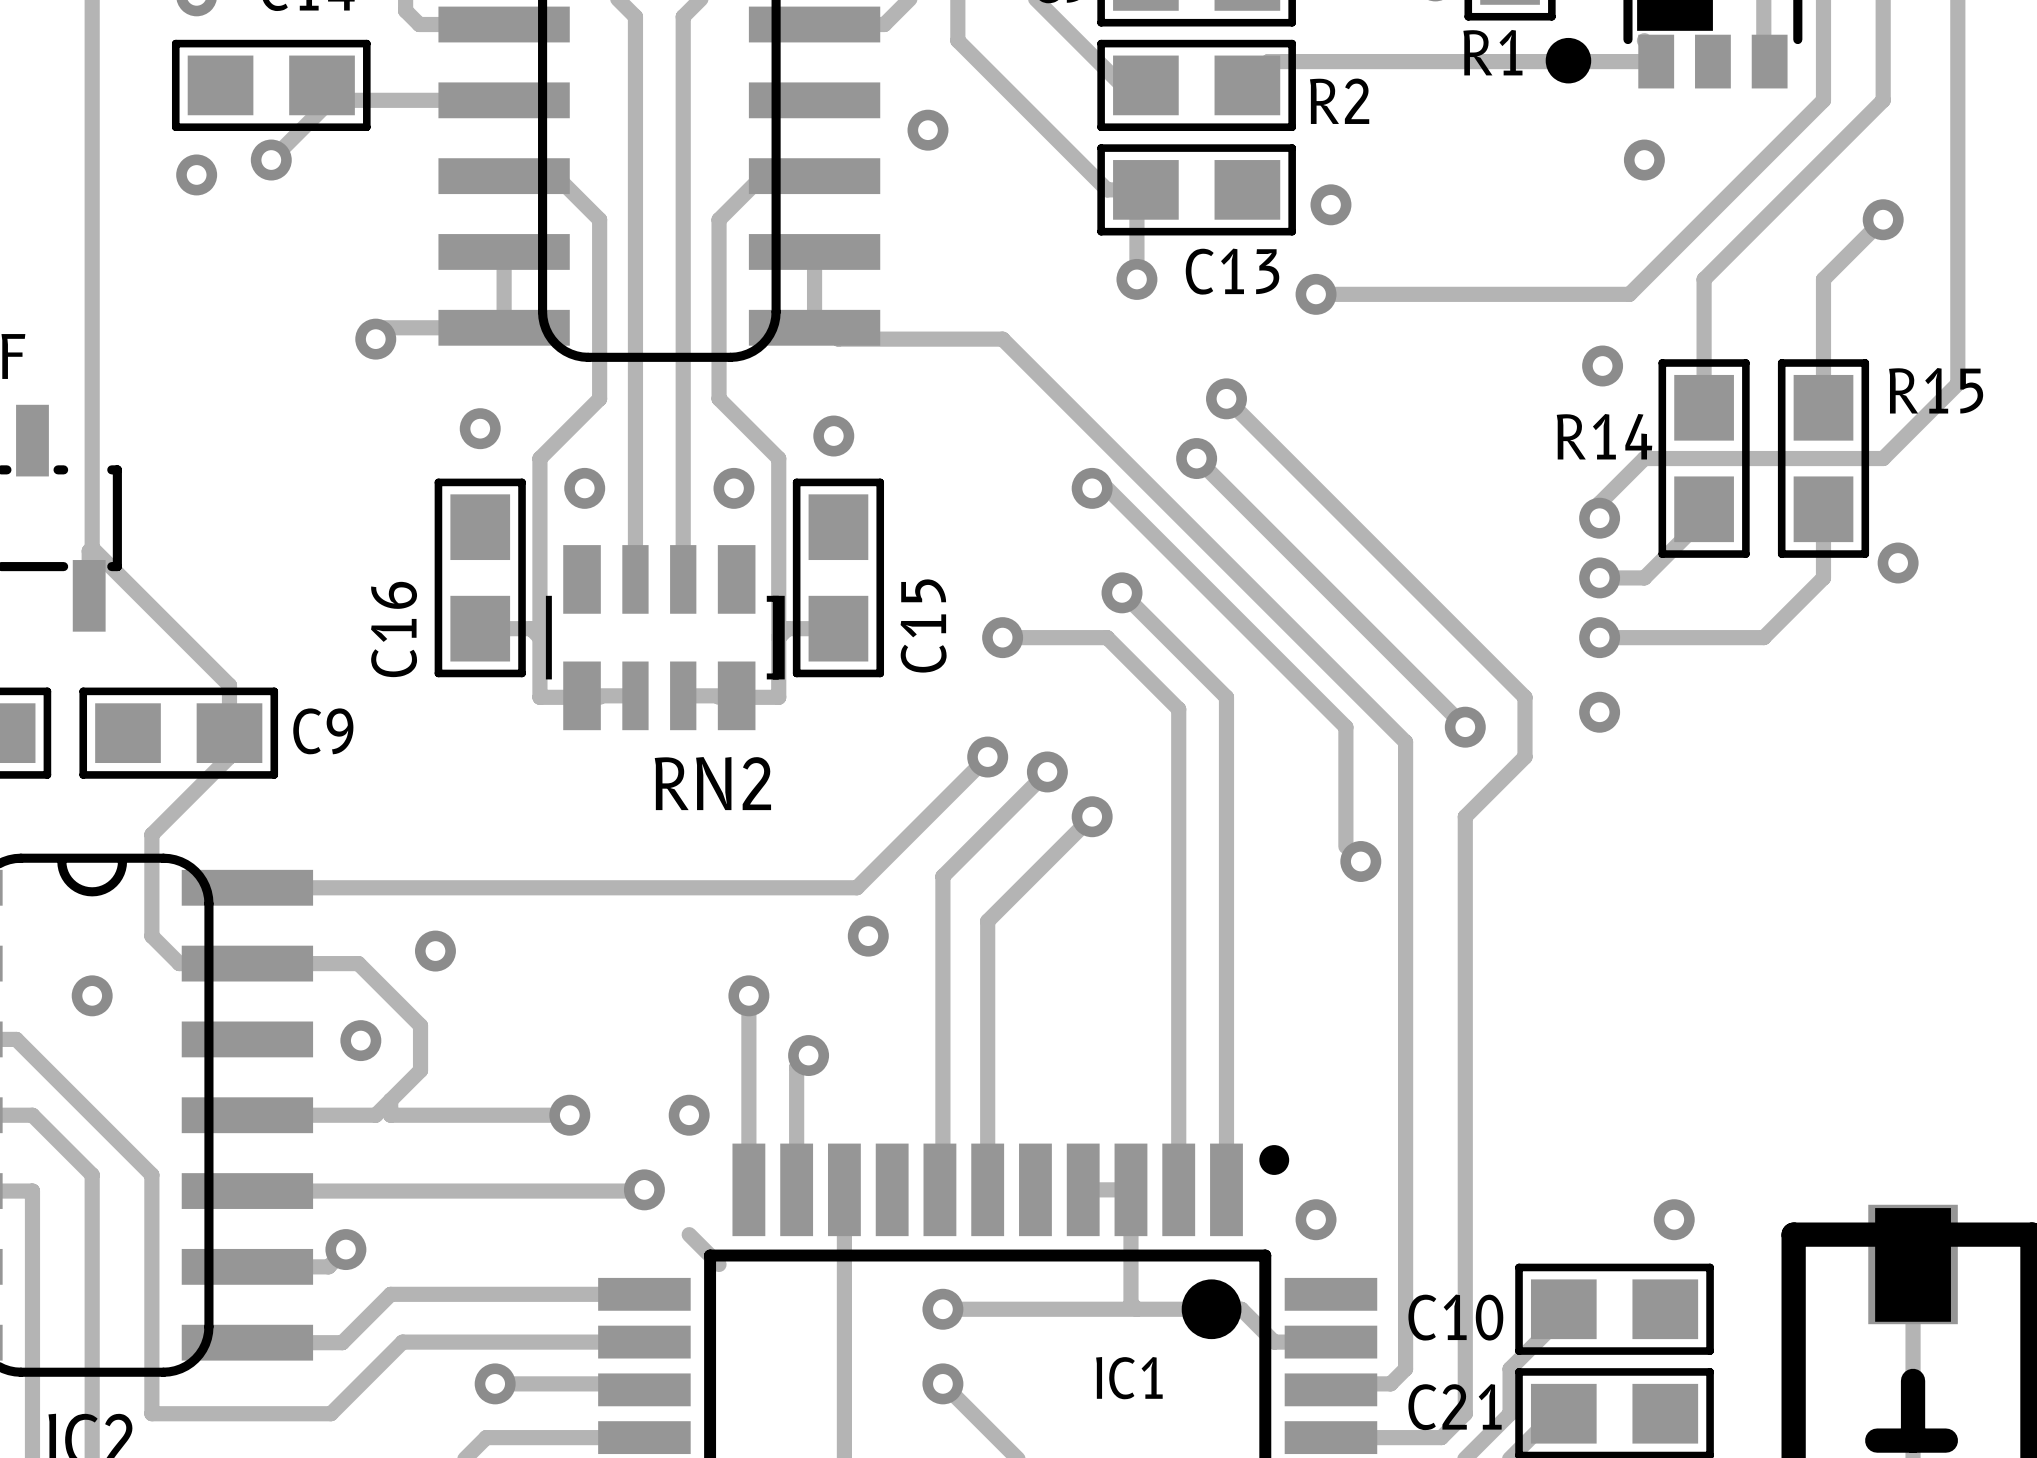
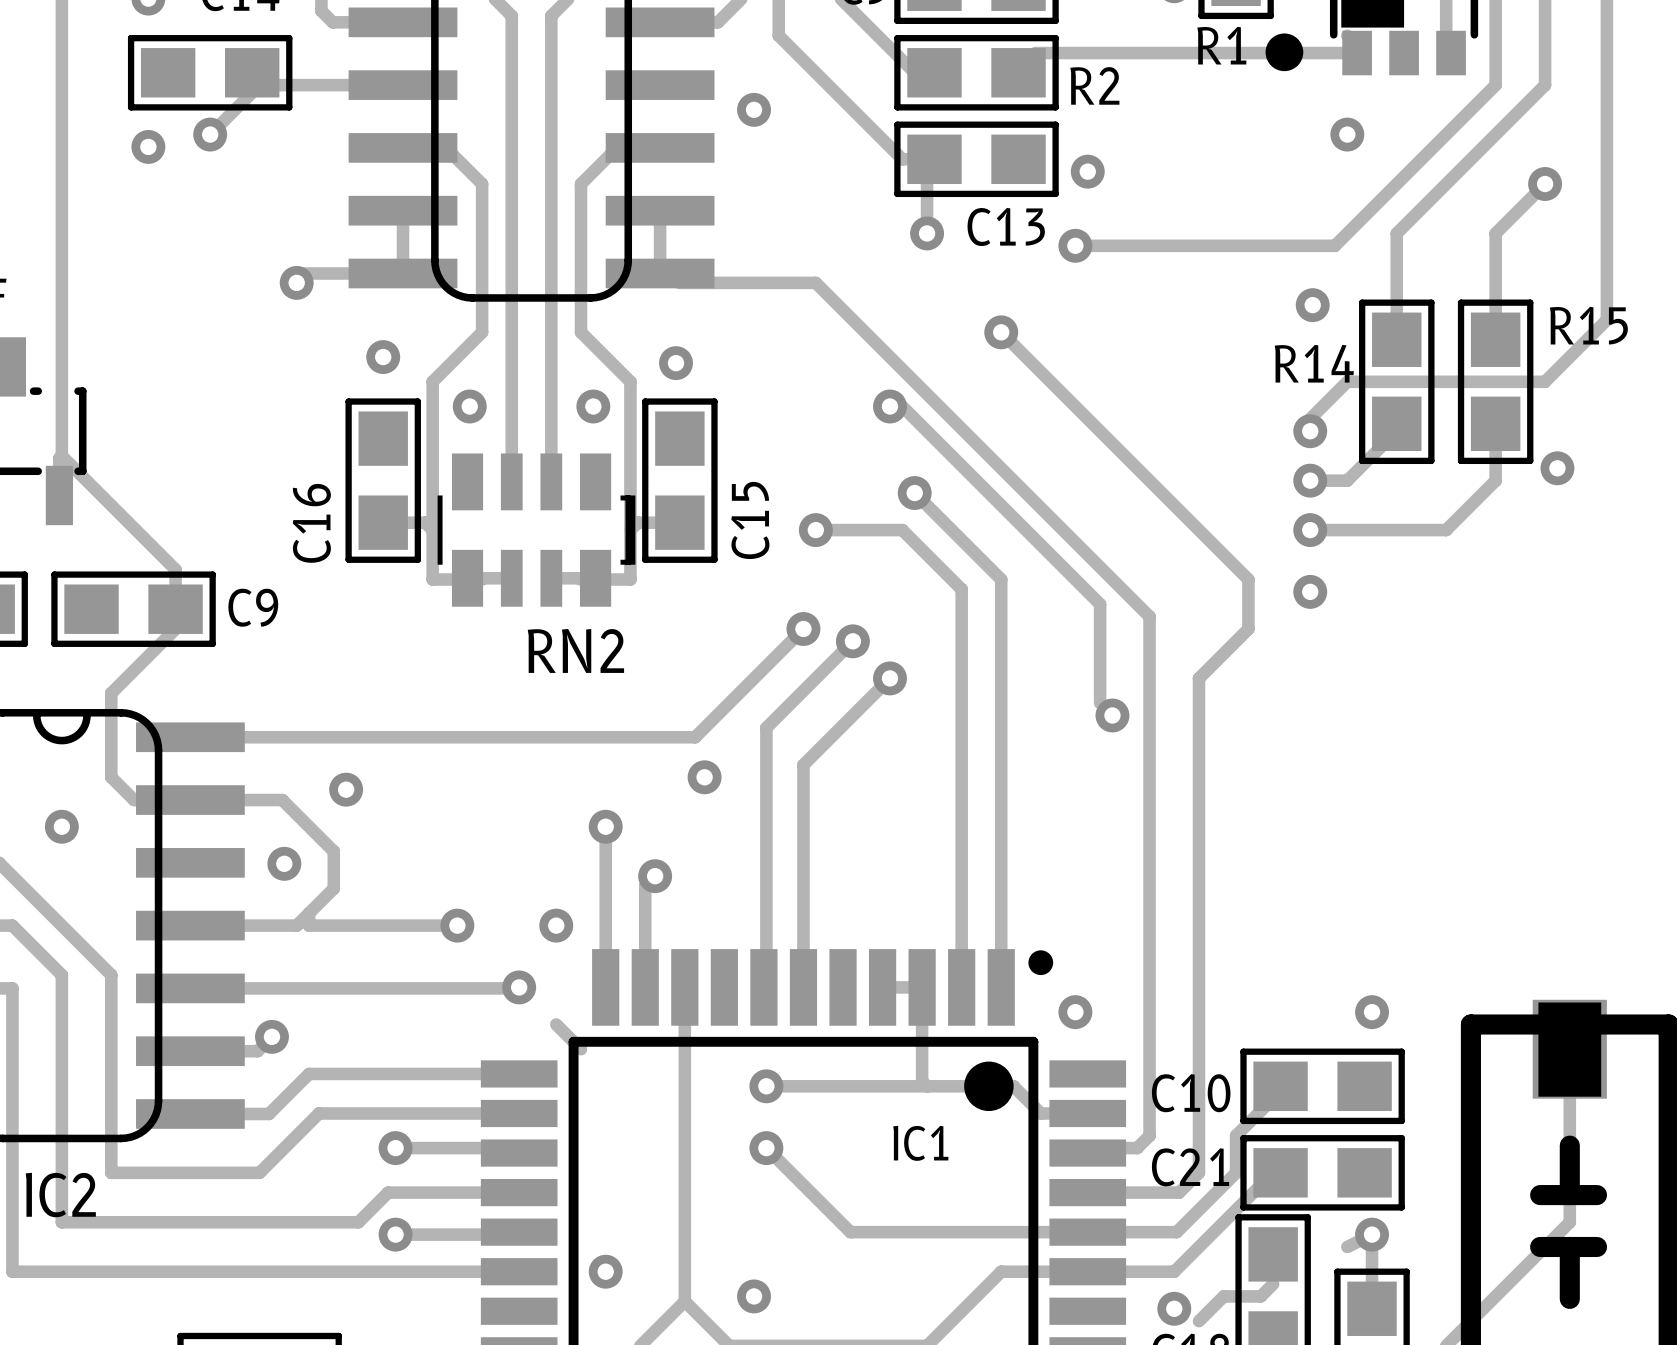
track: (1196, 458) (1465, 727) -> none
via: (1196, 458) -> none
via: (1465, 727) -> none

